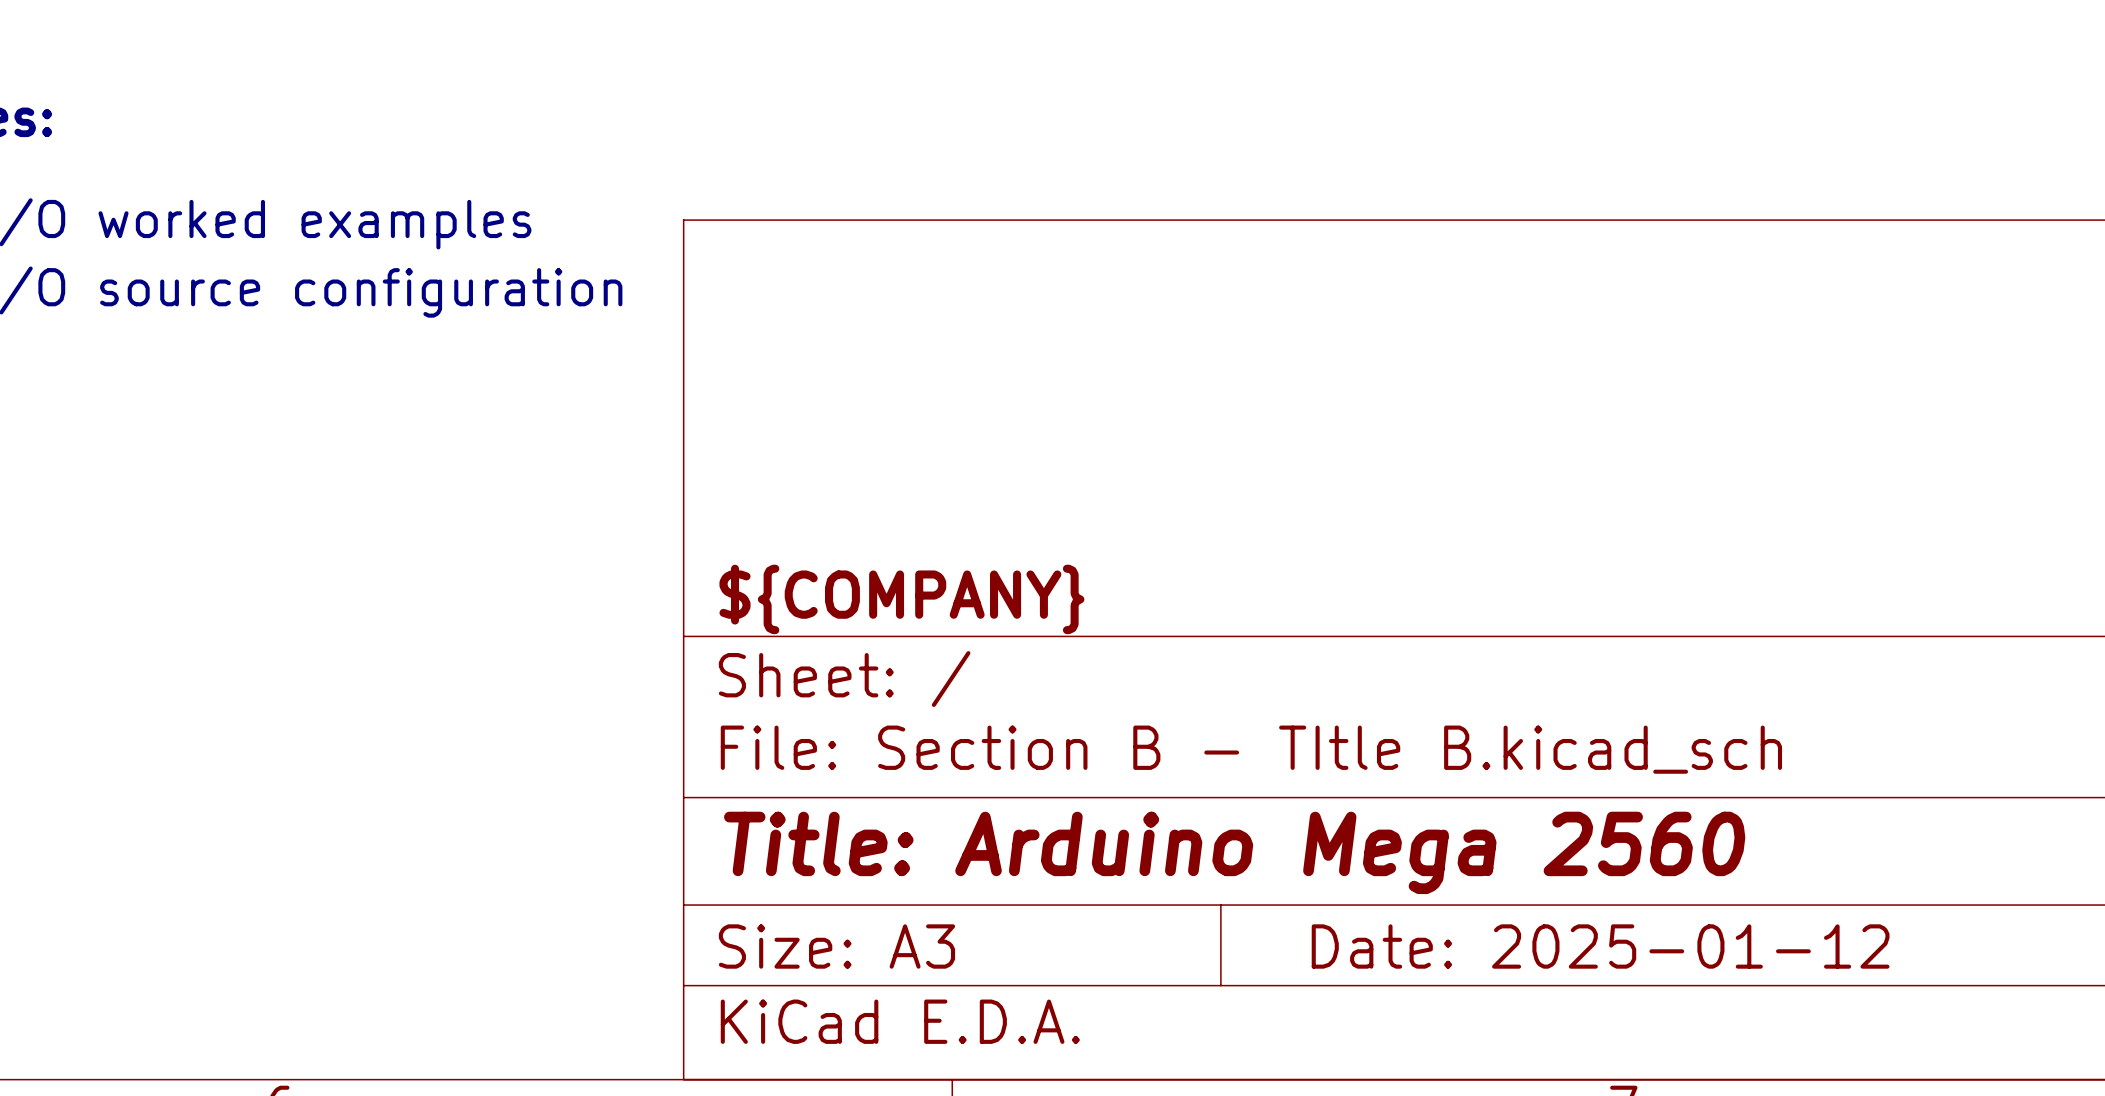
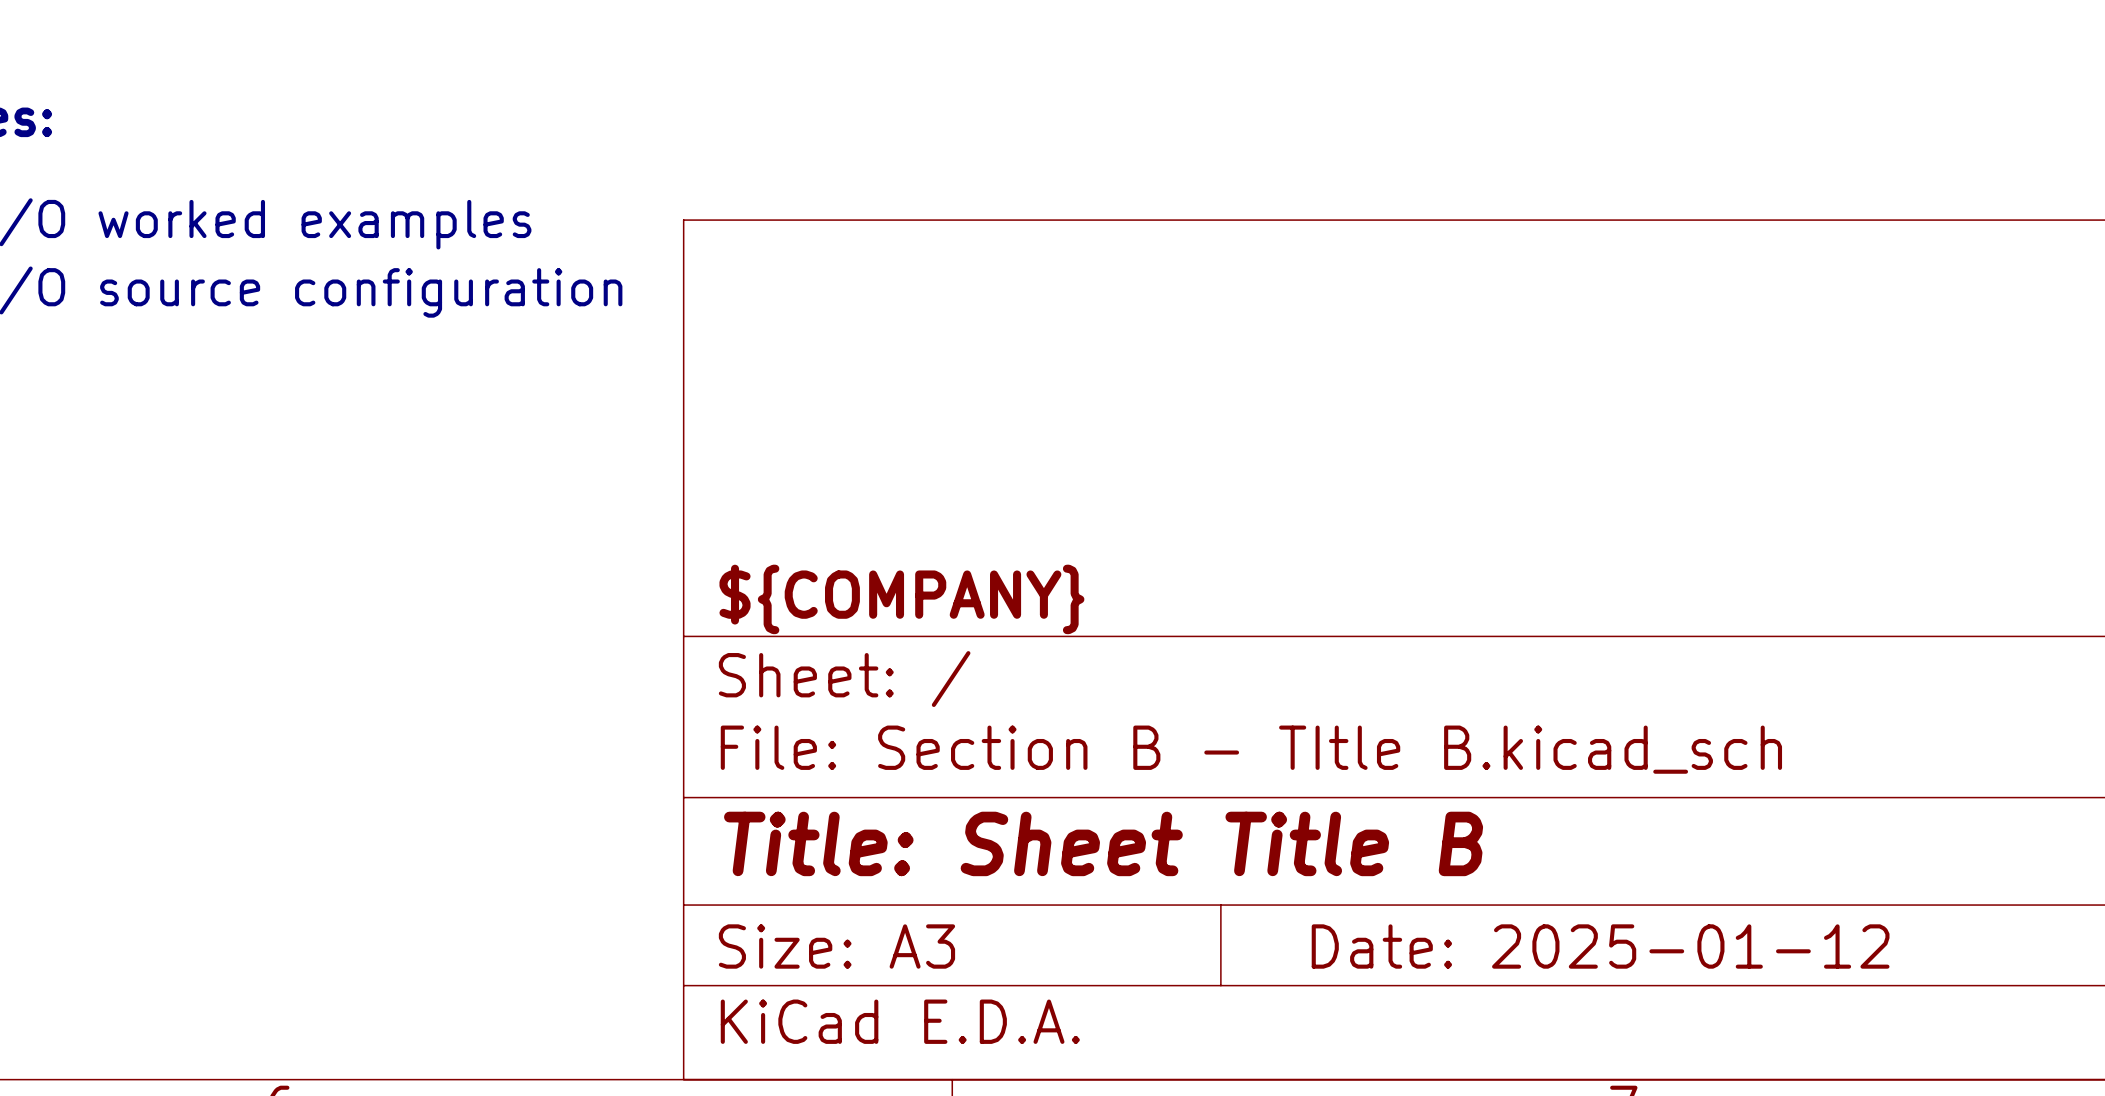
title block: Title: Arduino Mega 2560 (1234, 852) -> Title: Sheet Title B (1103, 843)

